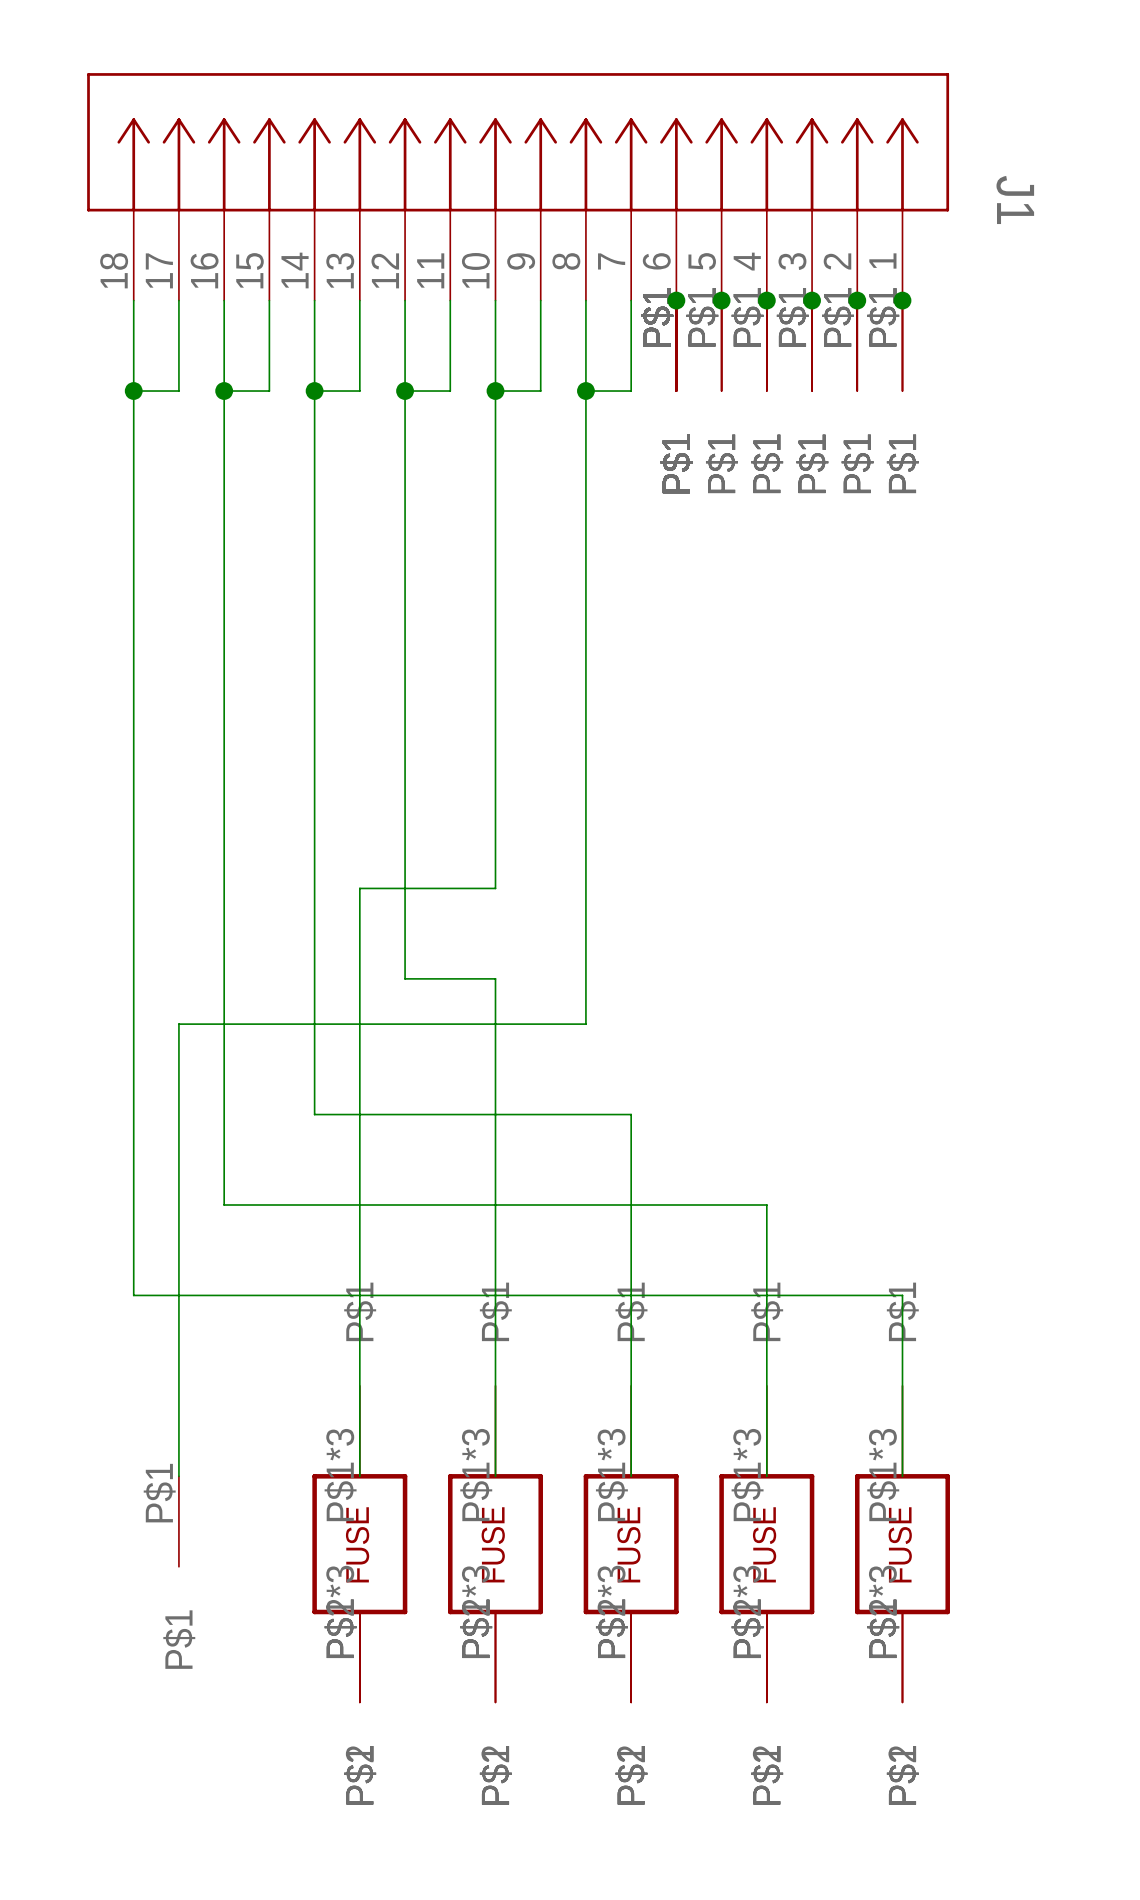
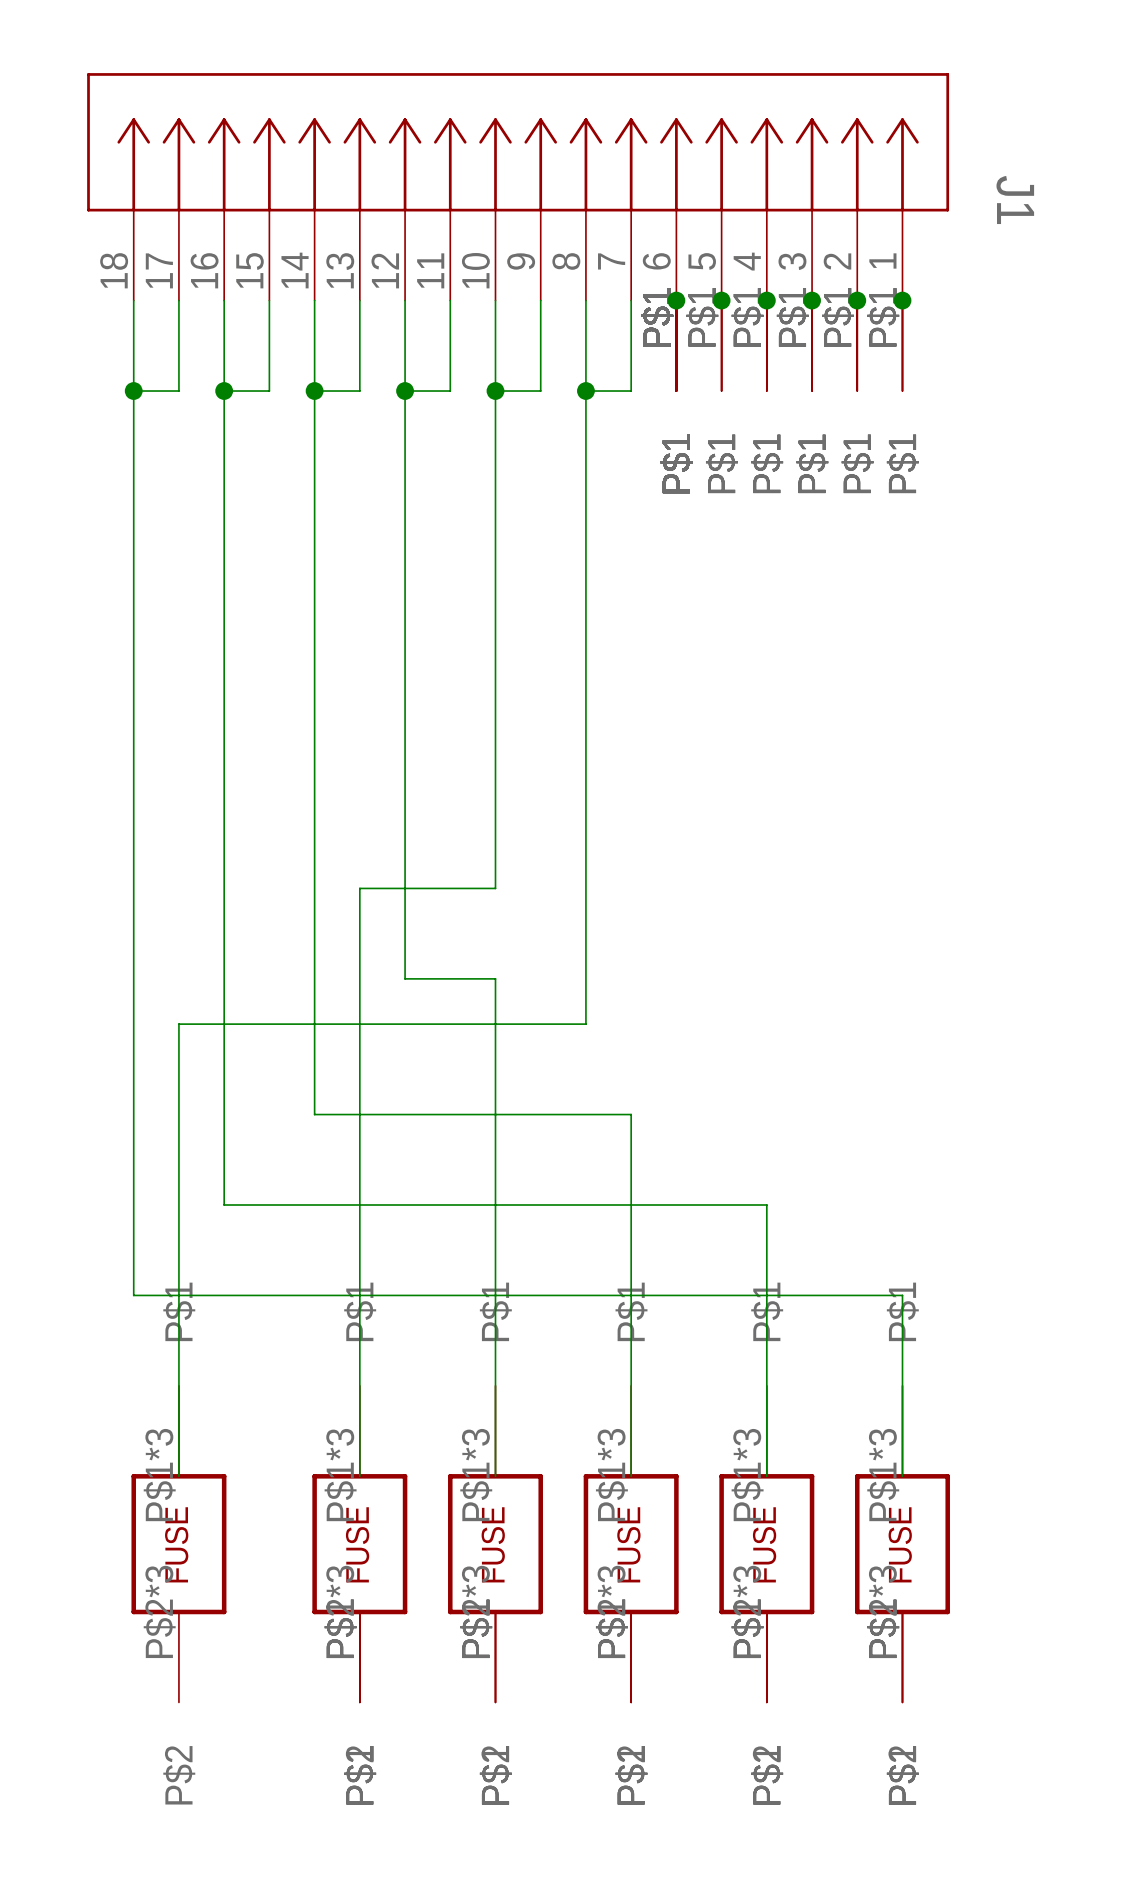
part: (178, 1521) -> none
part: none -> (178, 1544)

